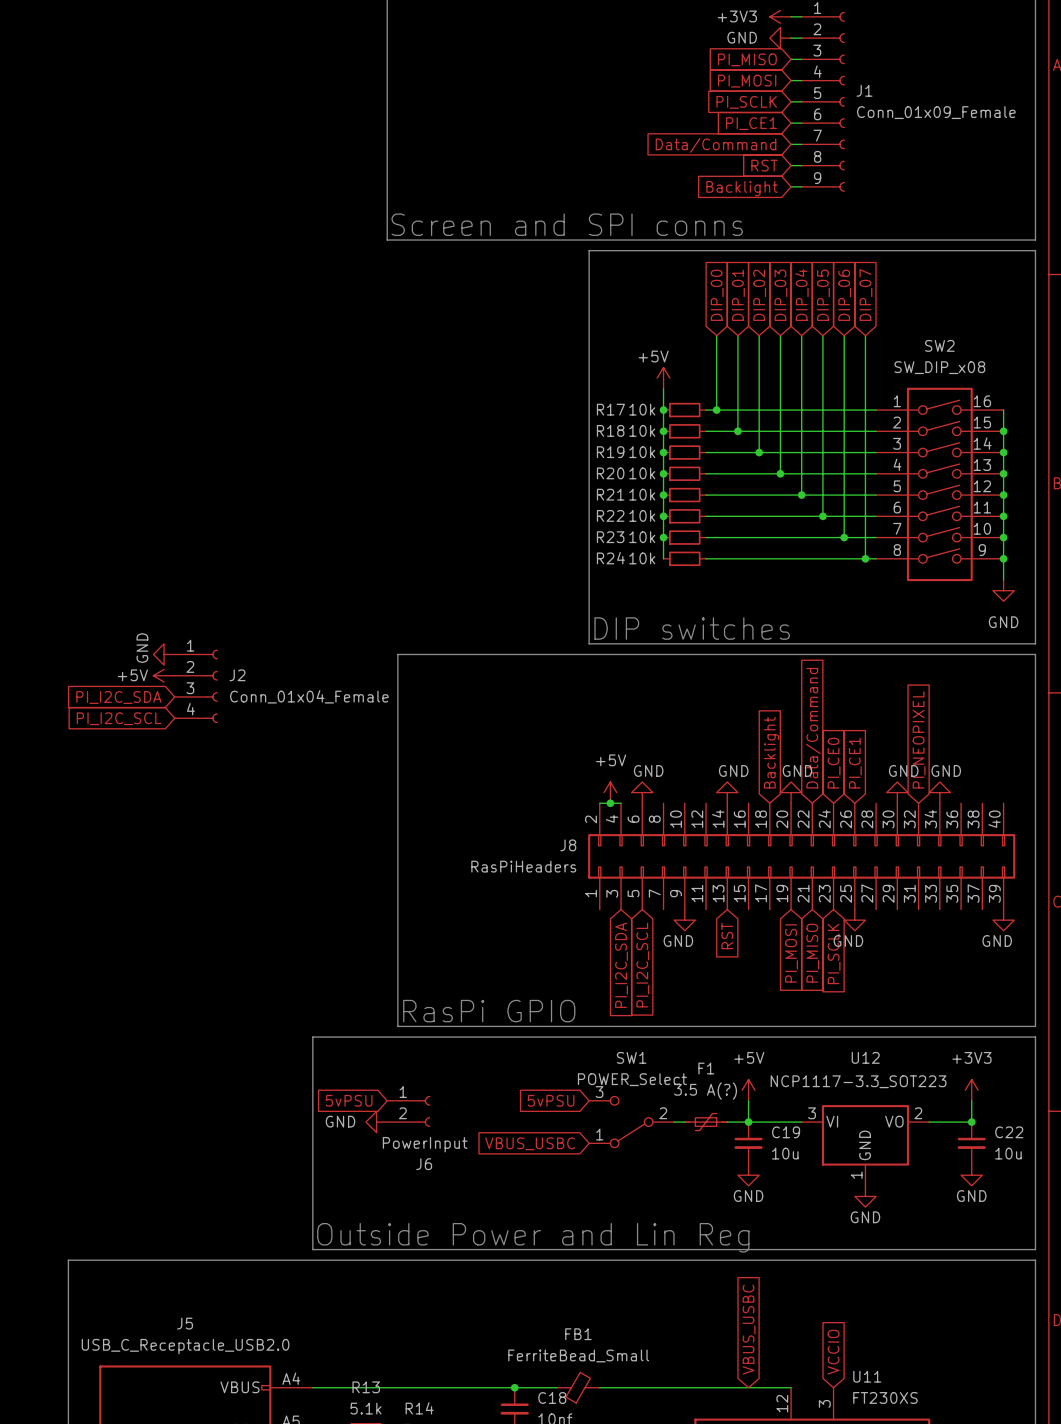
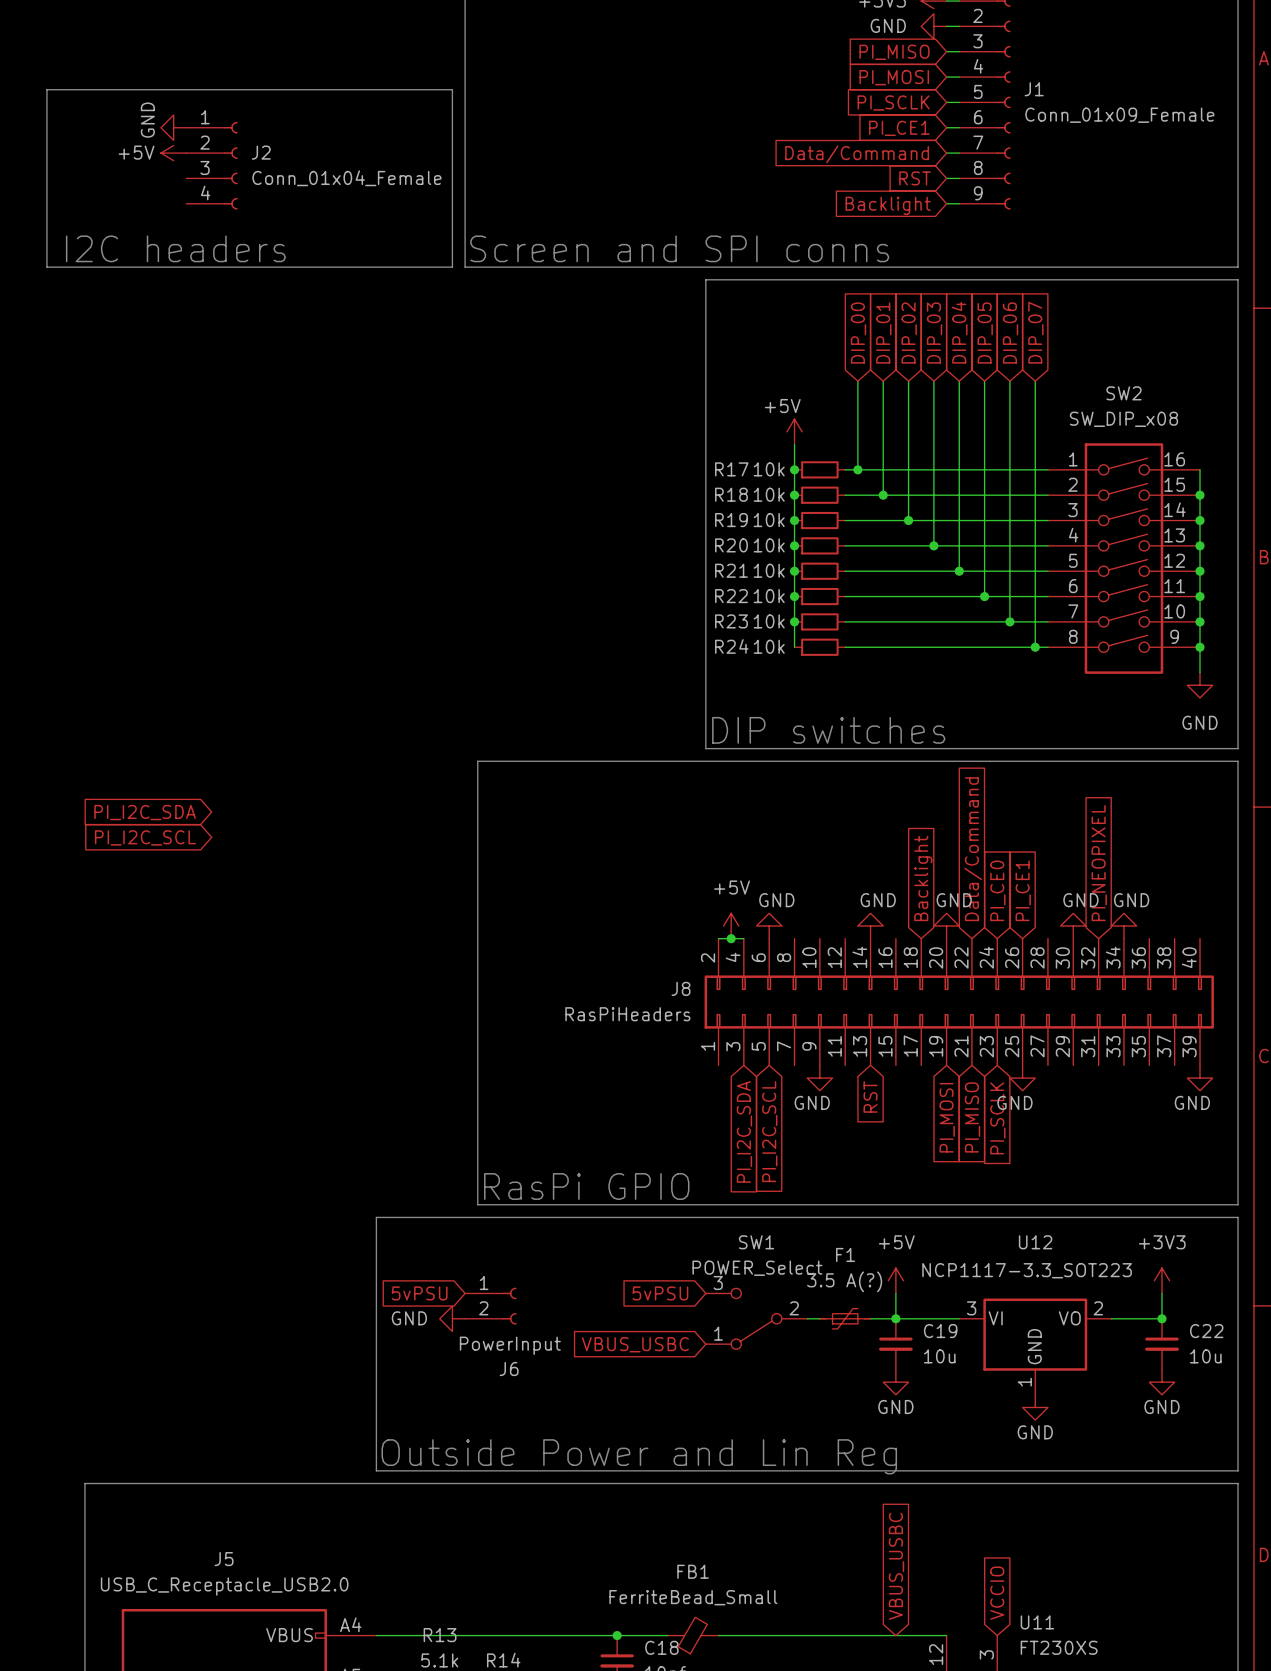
line: none -> (46, 89) (46, 267) (452, 267) (452, 89) (46, 89)
power symbol: none -> GND (173, 127)
power symbol: none -> +5V (173, 153)
text: none -> I2C headers (175, 248)
power symbol: GND (164, 654) -> none
power symbol: +5V (164, 675) -> none
J2 position: (196, 686) -> (212, 165)

